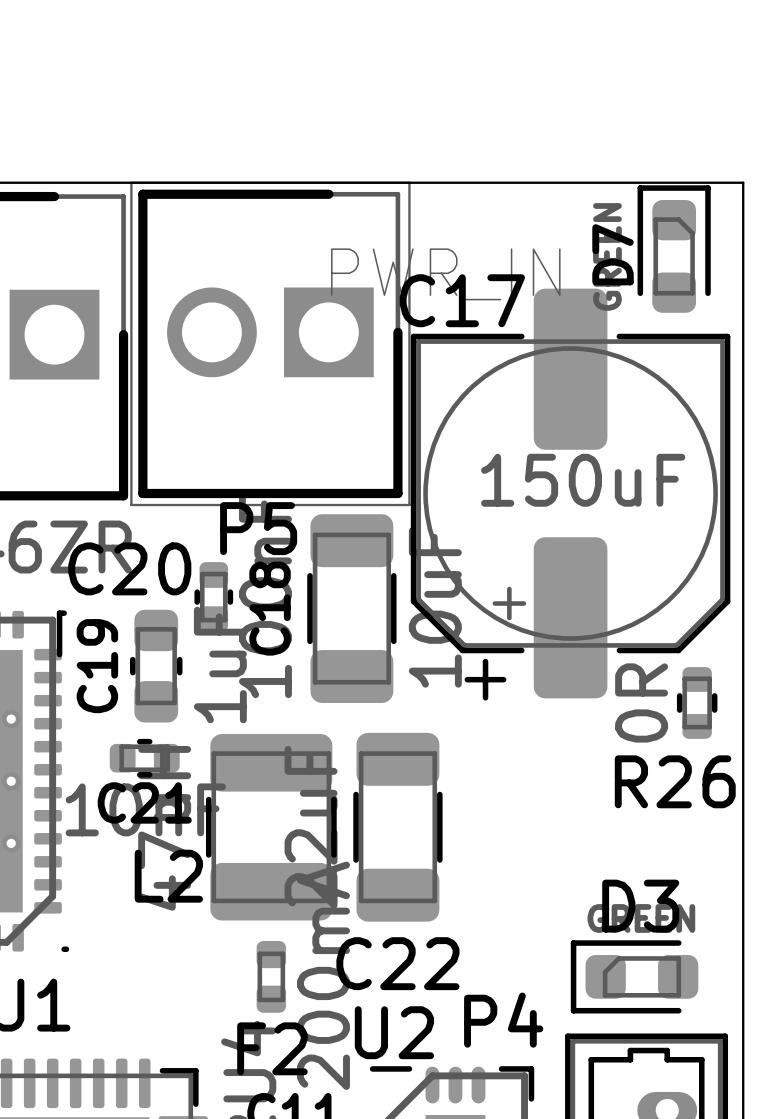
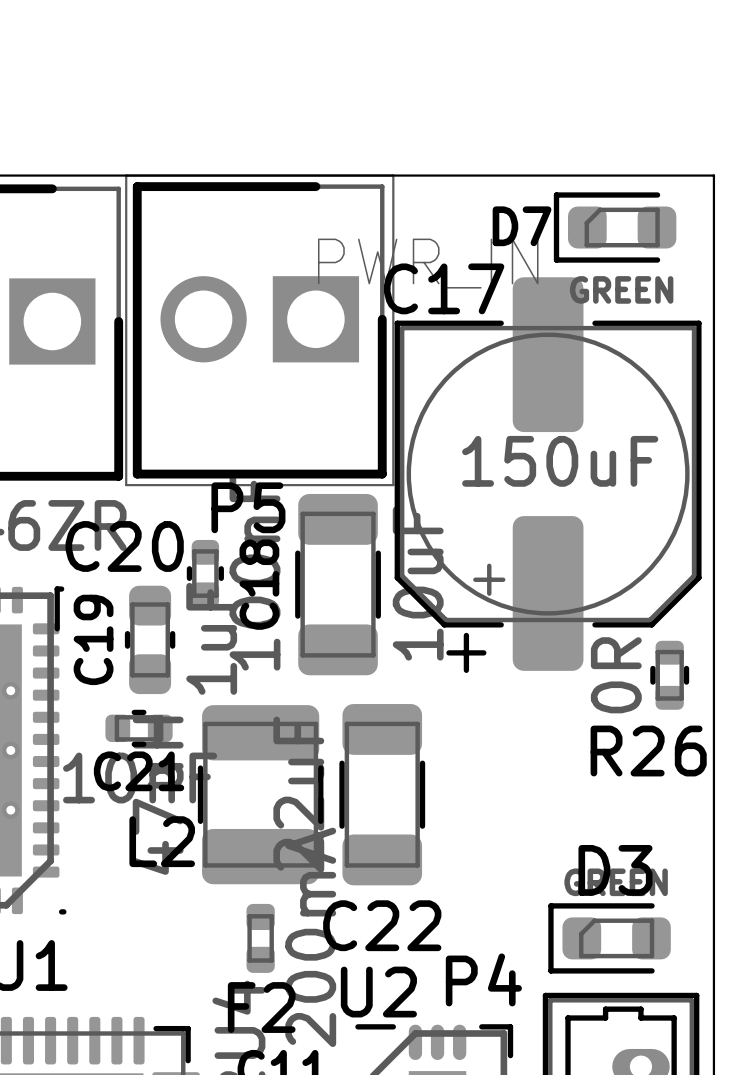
D7 rotation: 0° (674, 249) -> 90° counterclockwise (615, 227)

